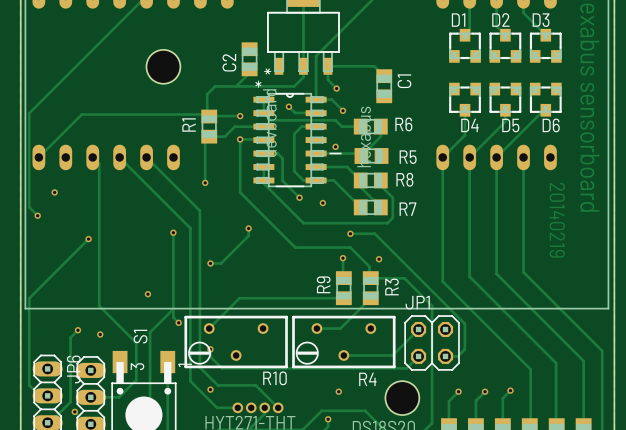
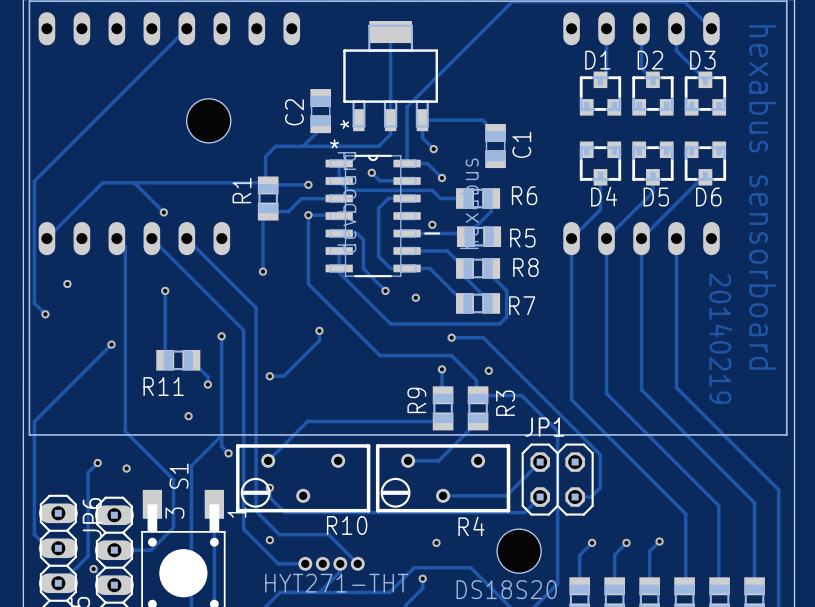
track: none -> (134, 182) (163, 212)
via: none -> (163, 212)
track: none -> (165, 290) (165, 360)
via: none -> (165, 290)
R11: none -> (178, 360)
track: none -> (191, 360) (207, 376) (207, 384)
via: none -> (207, 384)

